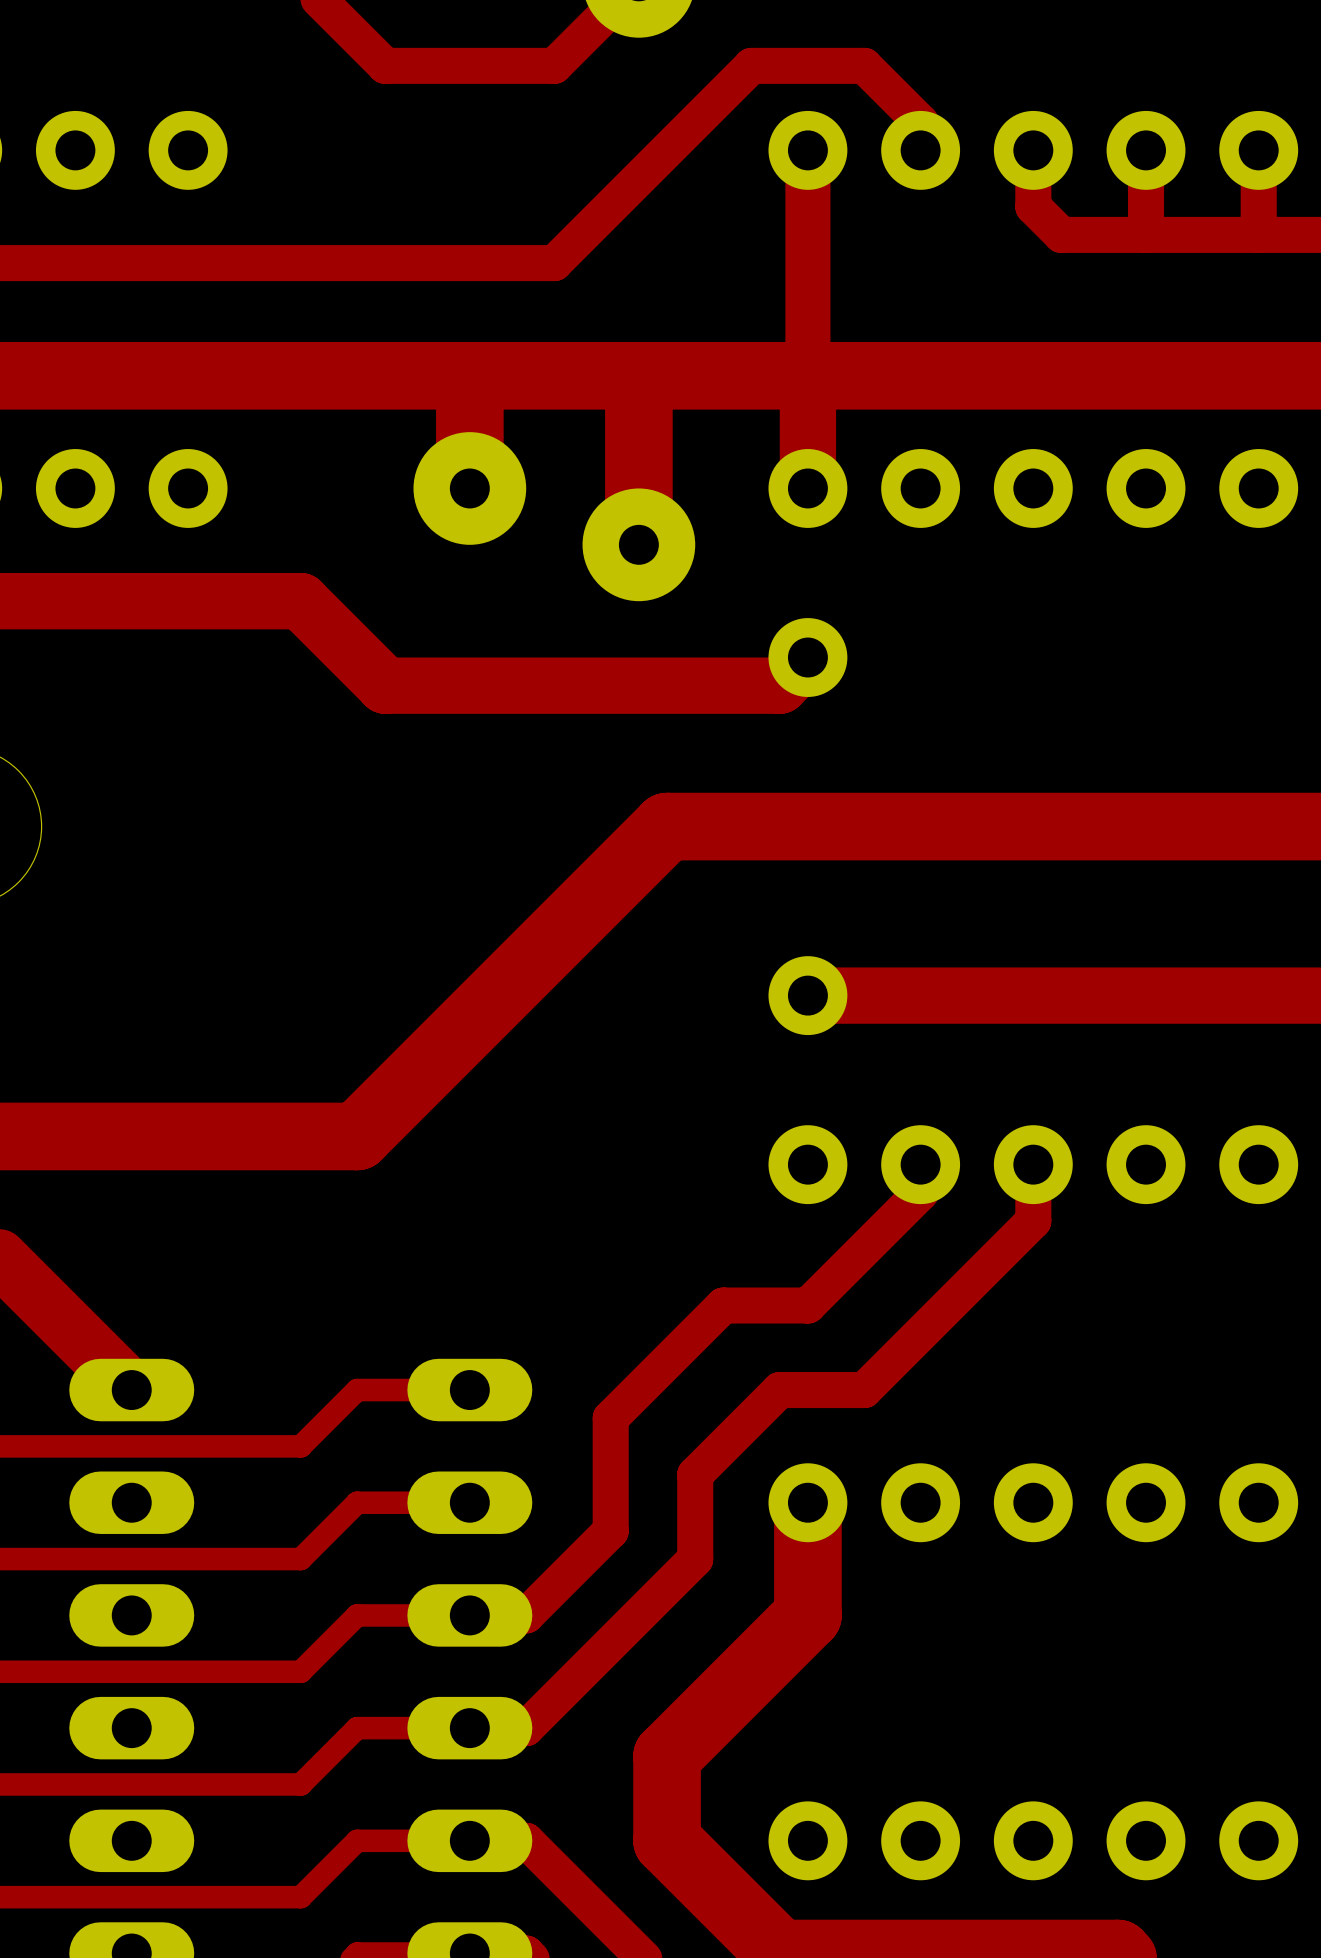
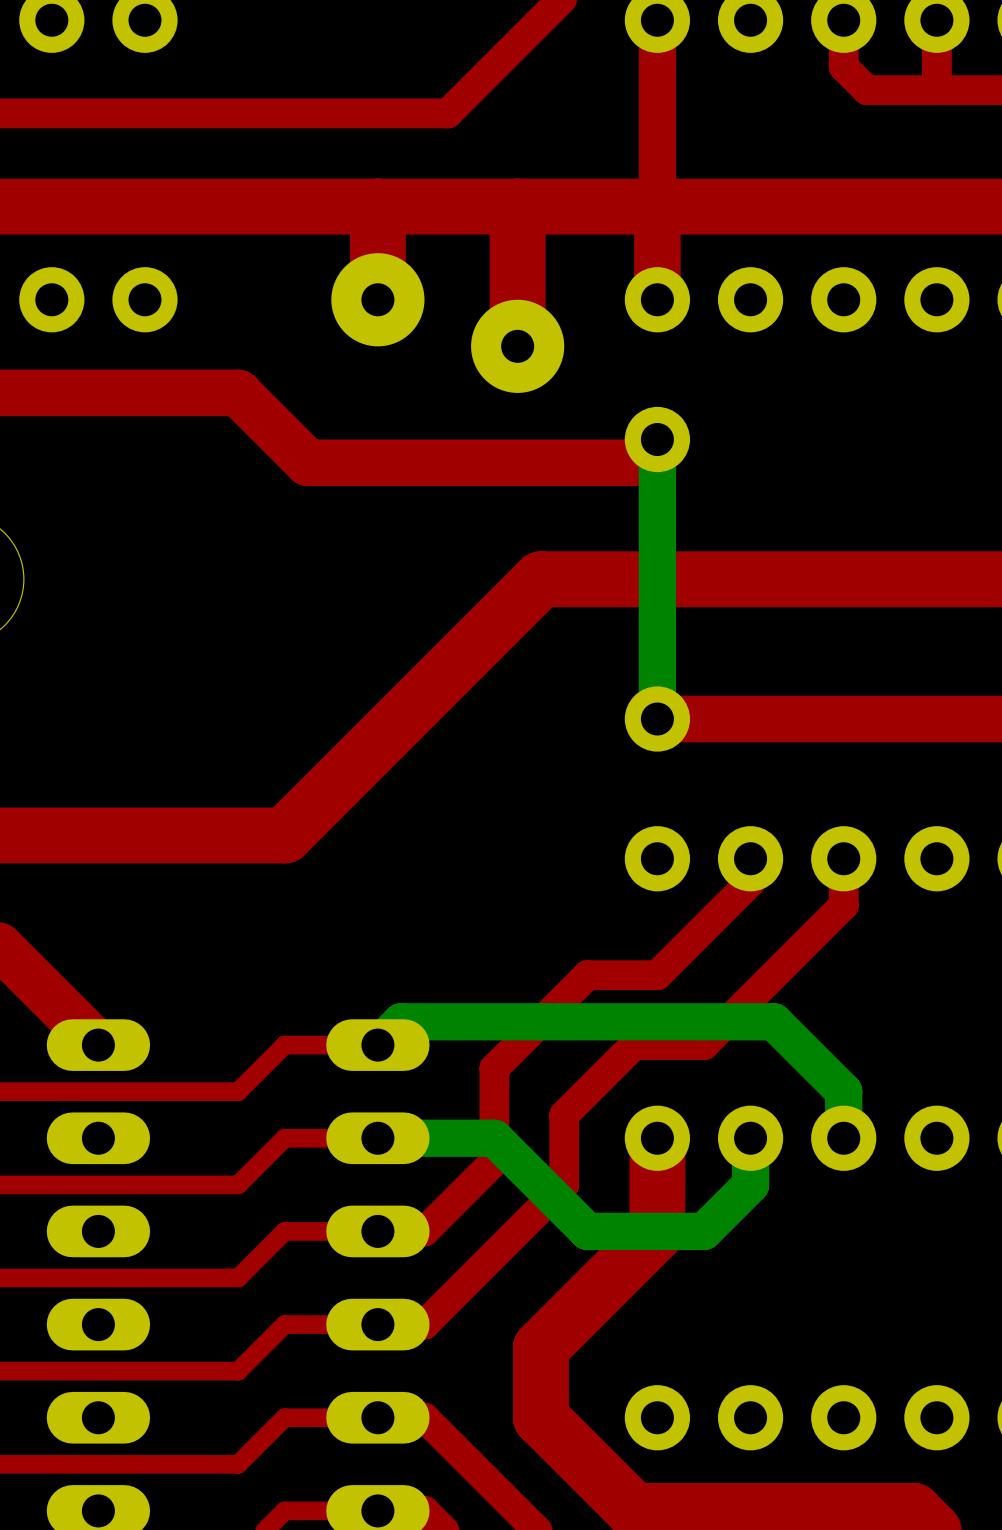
bottom track: none -> (657, 439) (657, 719)
bottom track: none -> (377, 1045) (401, 1021) (773, 1021) (843, 1091) (843, 1138)
bottom track: none -> (750, 1138) (750, 1184) (703, 1231) (587, 1231) (494, 1138) (377, 1138)

